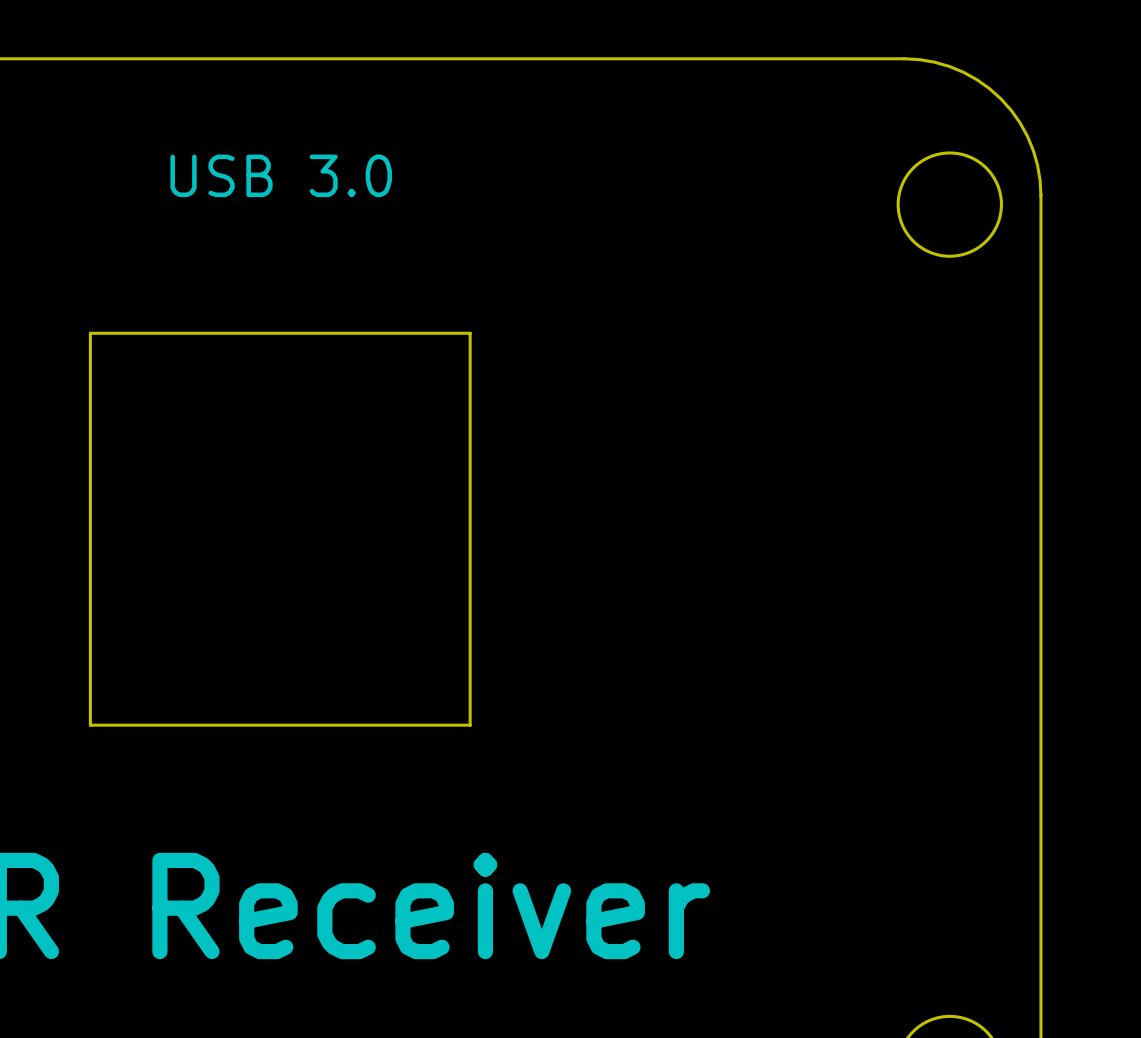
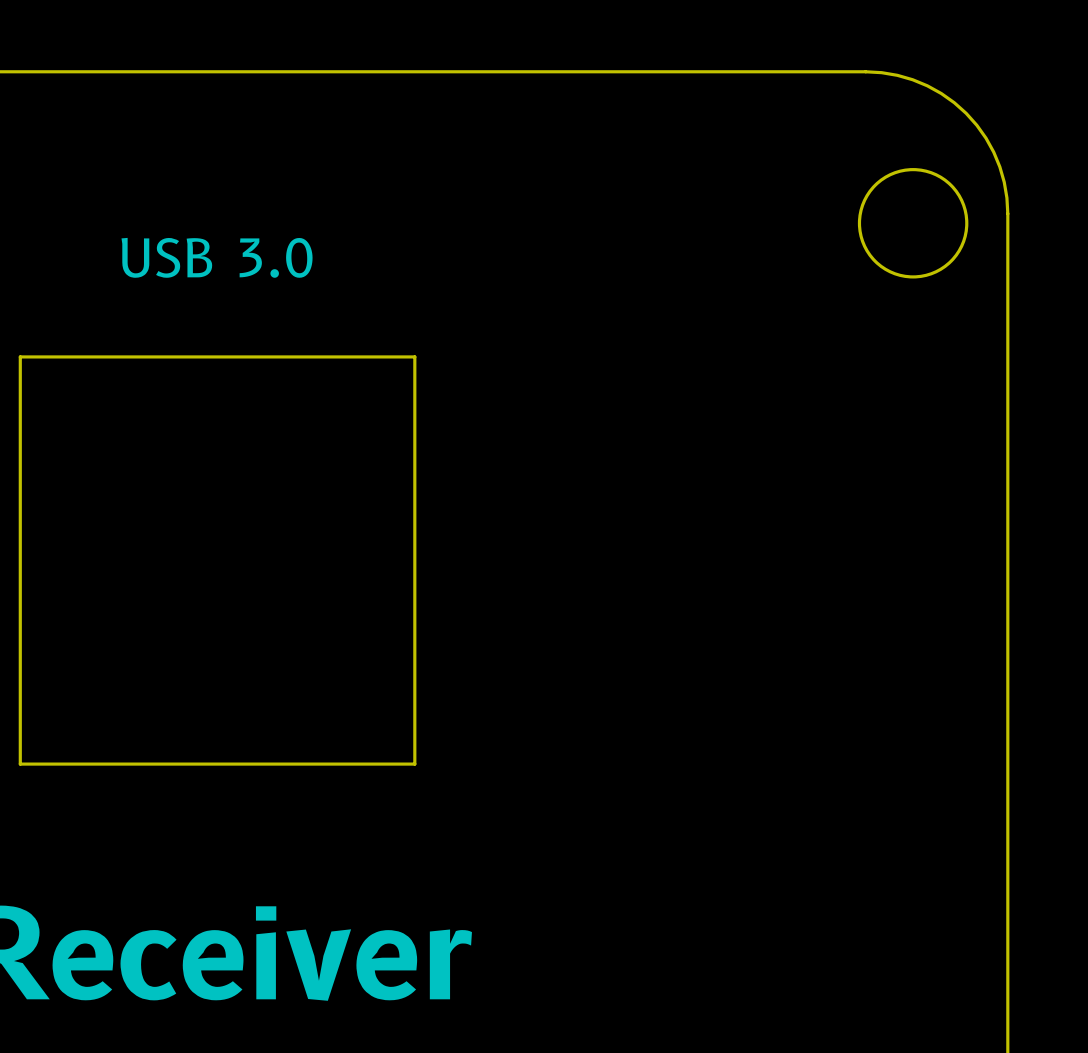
text position: USB 3.0 (281, 175) -> USB 3.0 (217, 257)

